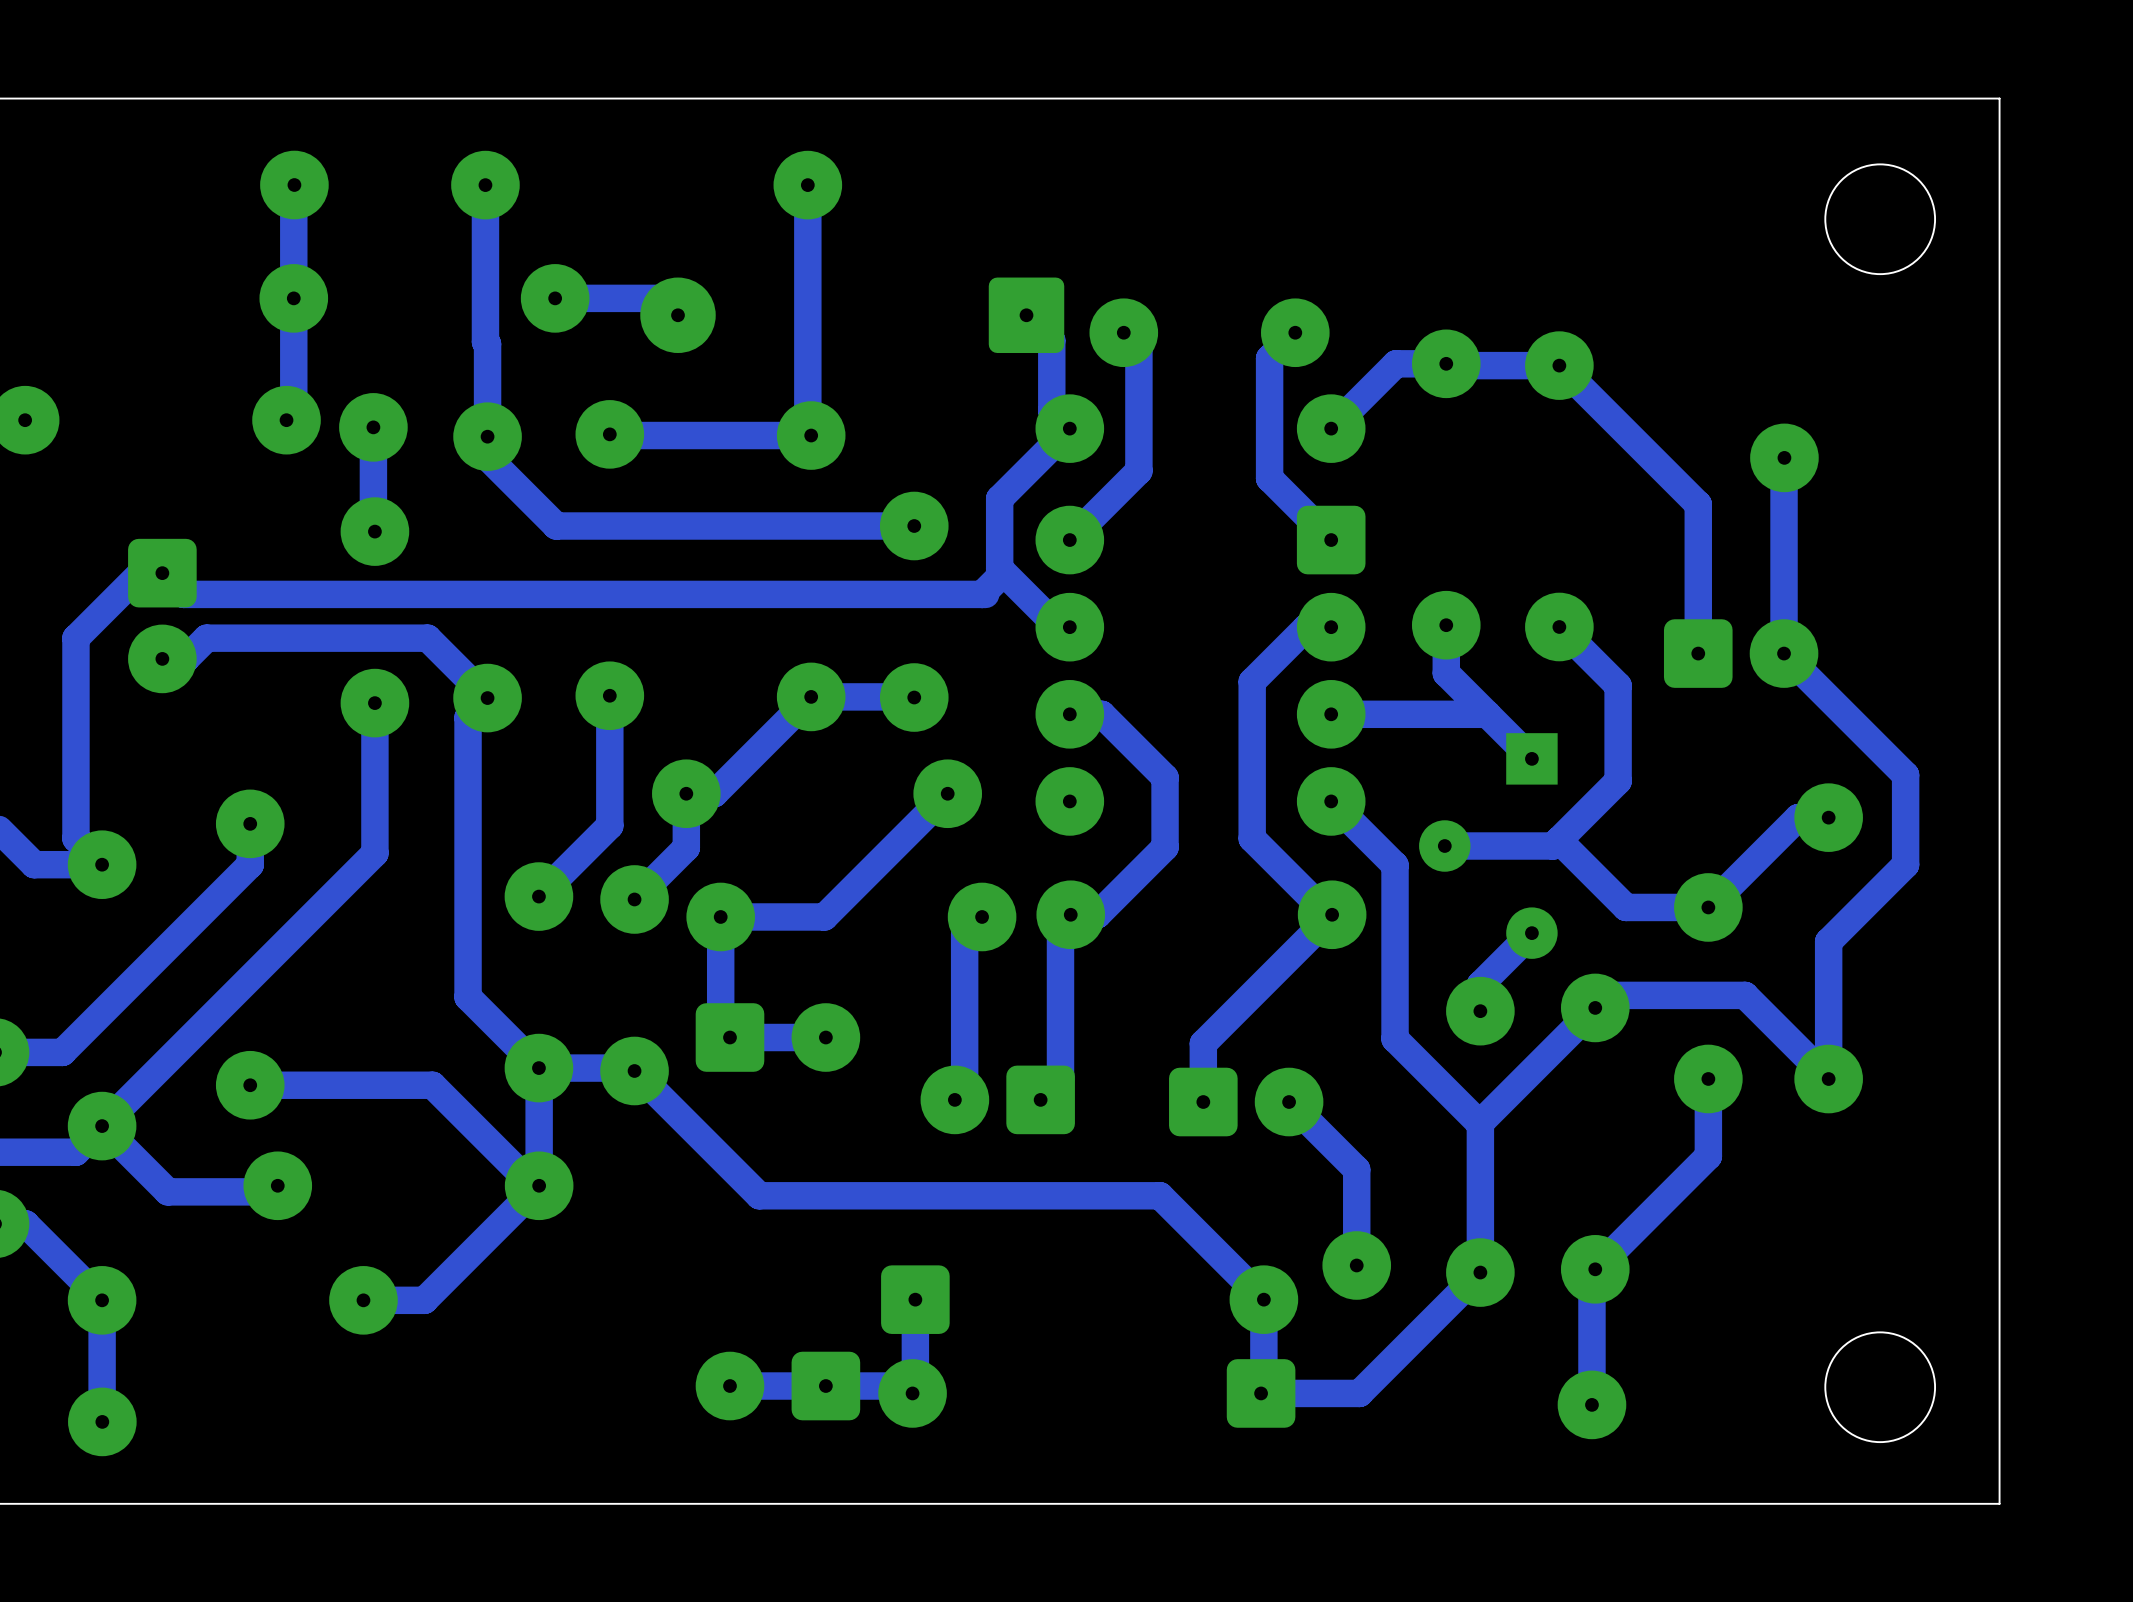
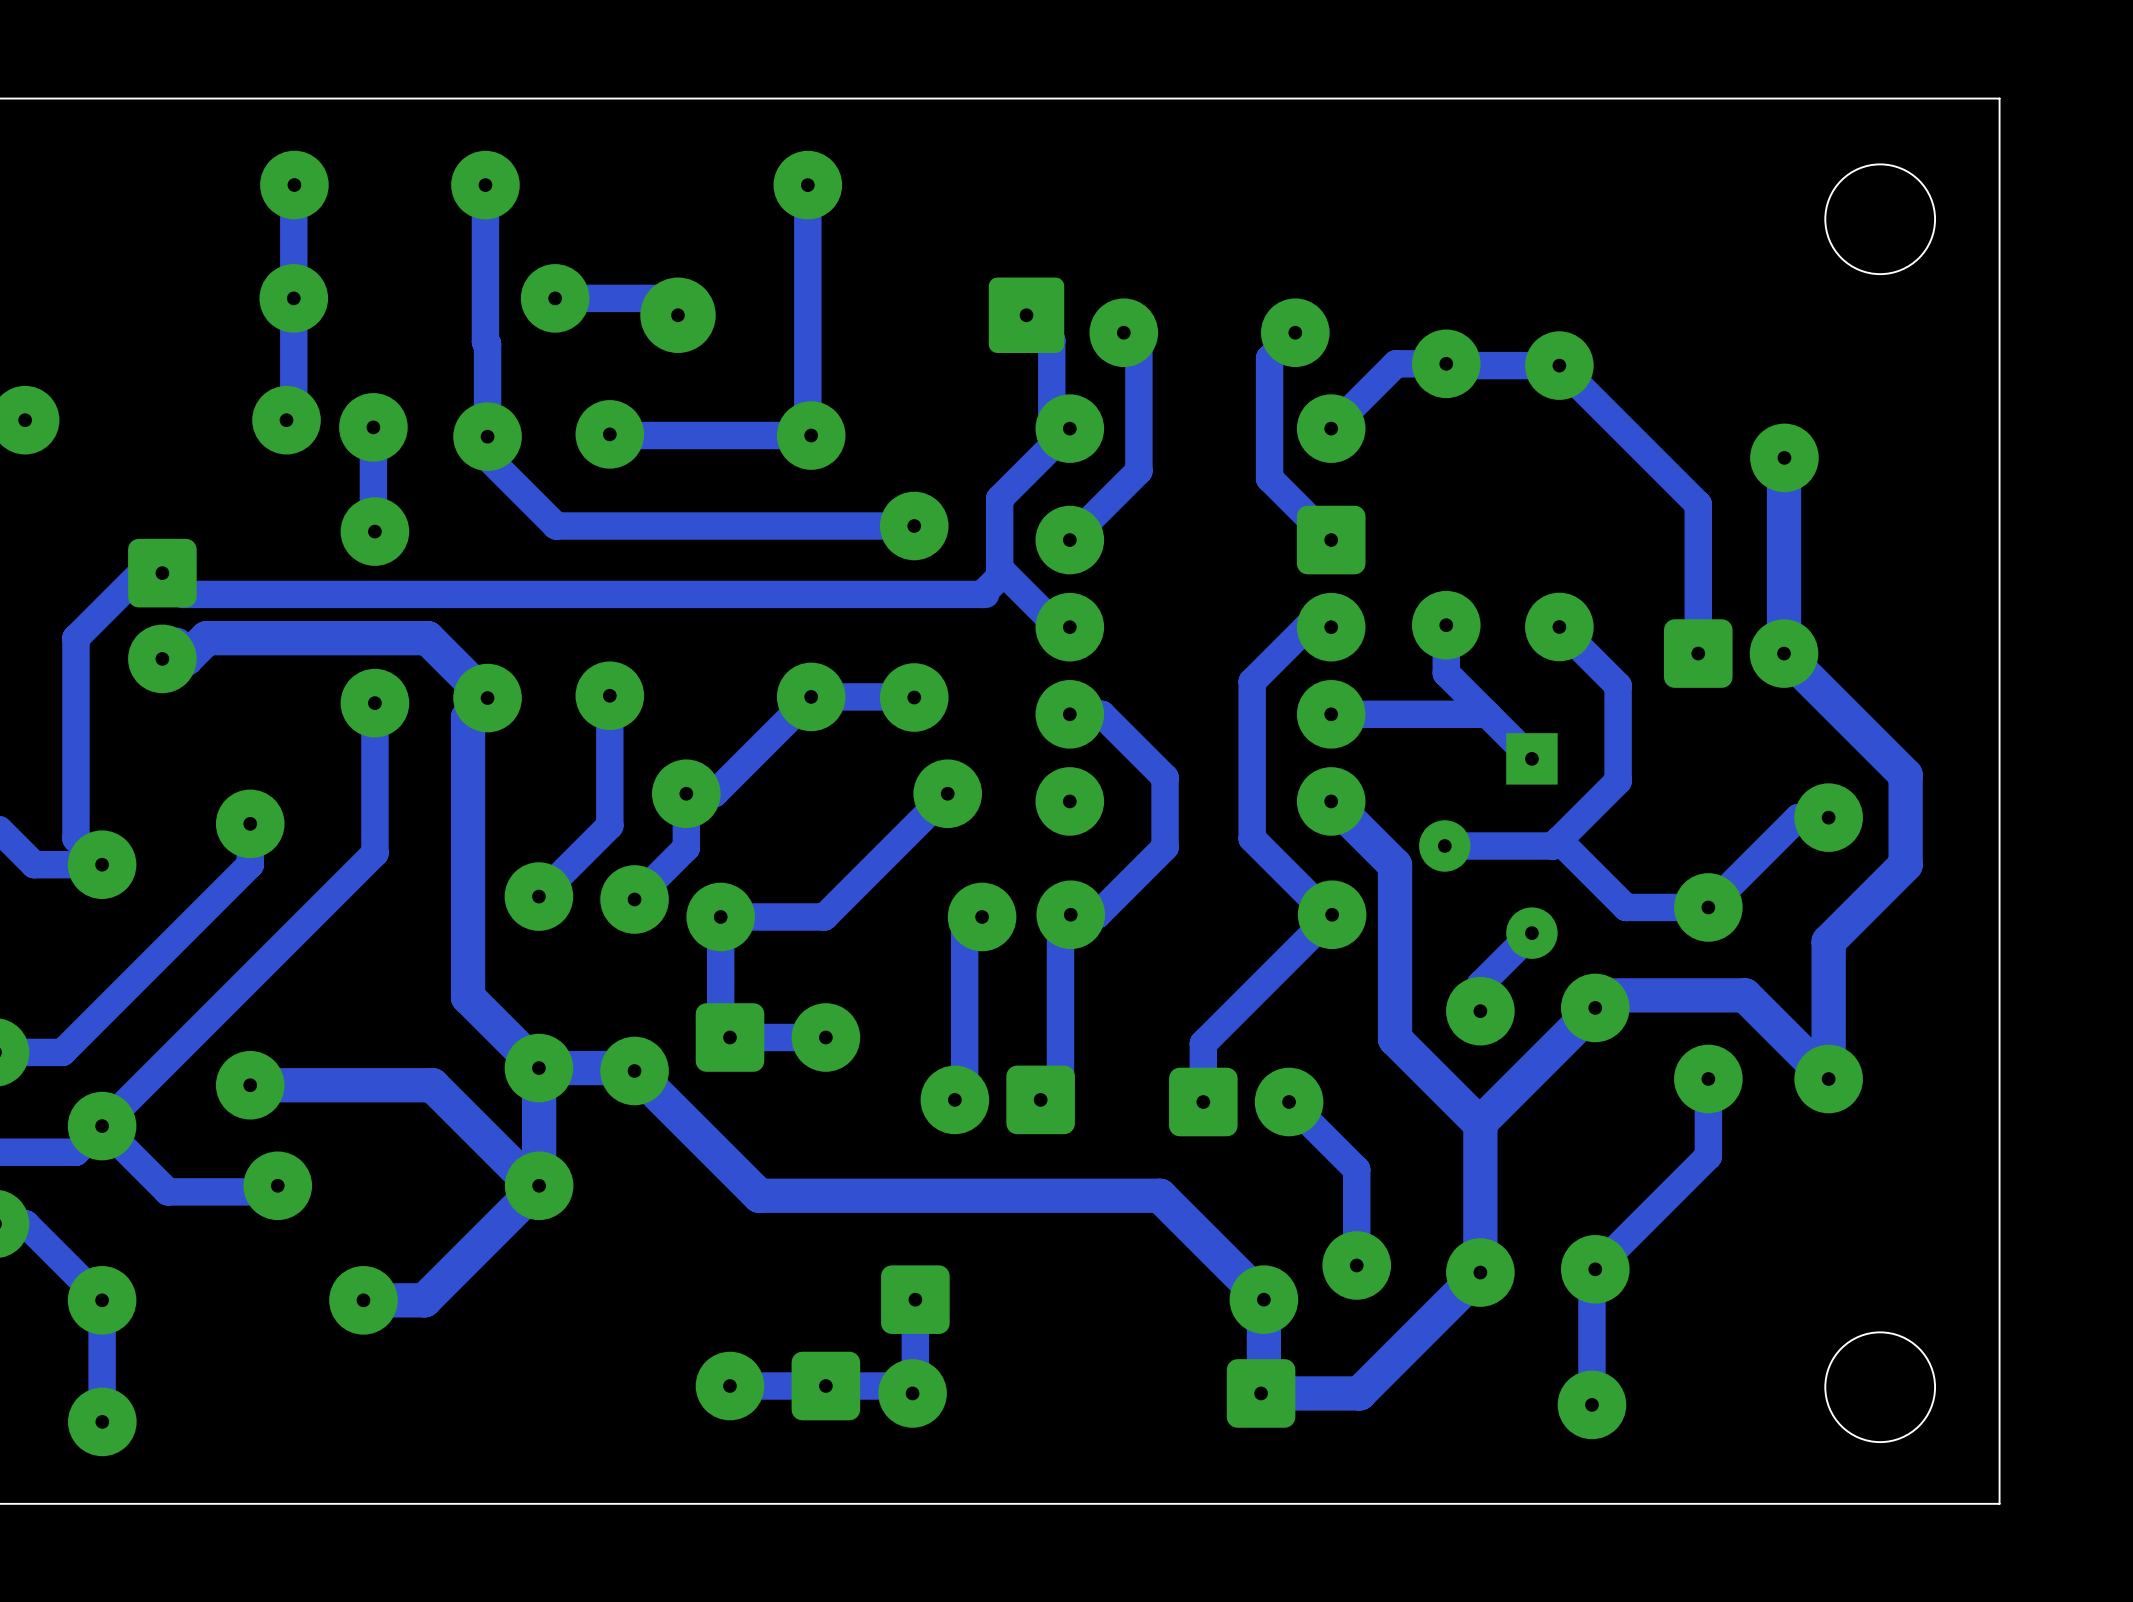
track width: thin (1784, 458) (1784, 653) (1905, 775) (1905, 864) (1828, 941) (1828, 1079) (1745, 995) (1607, 995) (1480, 1122) -> thick (1784, 458) (1784, 653) (1905, 775) (1905, 864) (1828, 941) (1828, 1079) (1745, 995) (1607, 995) (1480, 1122)
track width: thin (176, 644) (162, 658) (185, 658) (206, 638) (427, 638) (487, 698) (468, 717) (468, 997) (539, 1068) (539, 1191) -> thick (176, 644) (162, 658) (185, 658) (206, 638) (427, 638) (487, 698) (468, 717) (468, 997) (539, 1068) (539, 1191)
track width: thin (1331, 801) (1395, 865) (1395, 1038) (1480, 1122) -> thick (1331, 801) (1395, 865) (1395, 1038) (1480, 1122)
track width: thin (538, 1068) (631, 1068) (759, 1195) (1160, 1195) (1263, 1299) (1263, 1390) (1261, 1393) (1359, 1393) (1480, 1272) (1480, 1122) -> thick (538, 1068) (631, 1068) (759, 1195) (1160, 1195) (1263, 1299) (1263, 1390) (1261, 1393) (1359, 1393) (1480, 1272) (1480, 1122)
track width: thin (250, 1085) (432, 1085) (539, 1191) -> thick (250, 1085) (432, 1085) (539, 1191)
track width: thin (539, 1191) (532, 1191) (424, 1300) (363, 1300) -> thick (539, 1191) (532, 1191) (424, 1300) (363, 1300)

